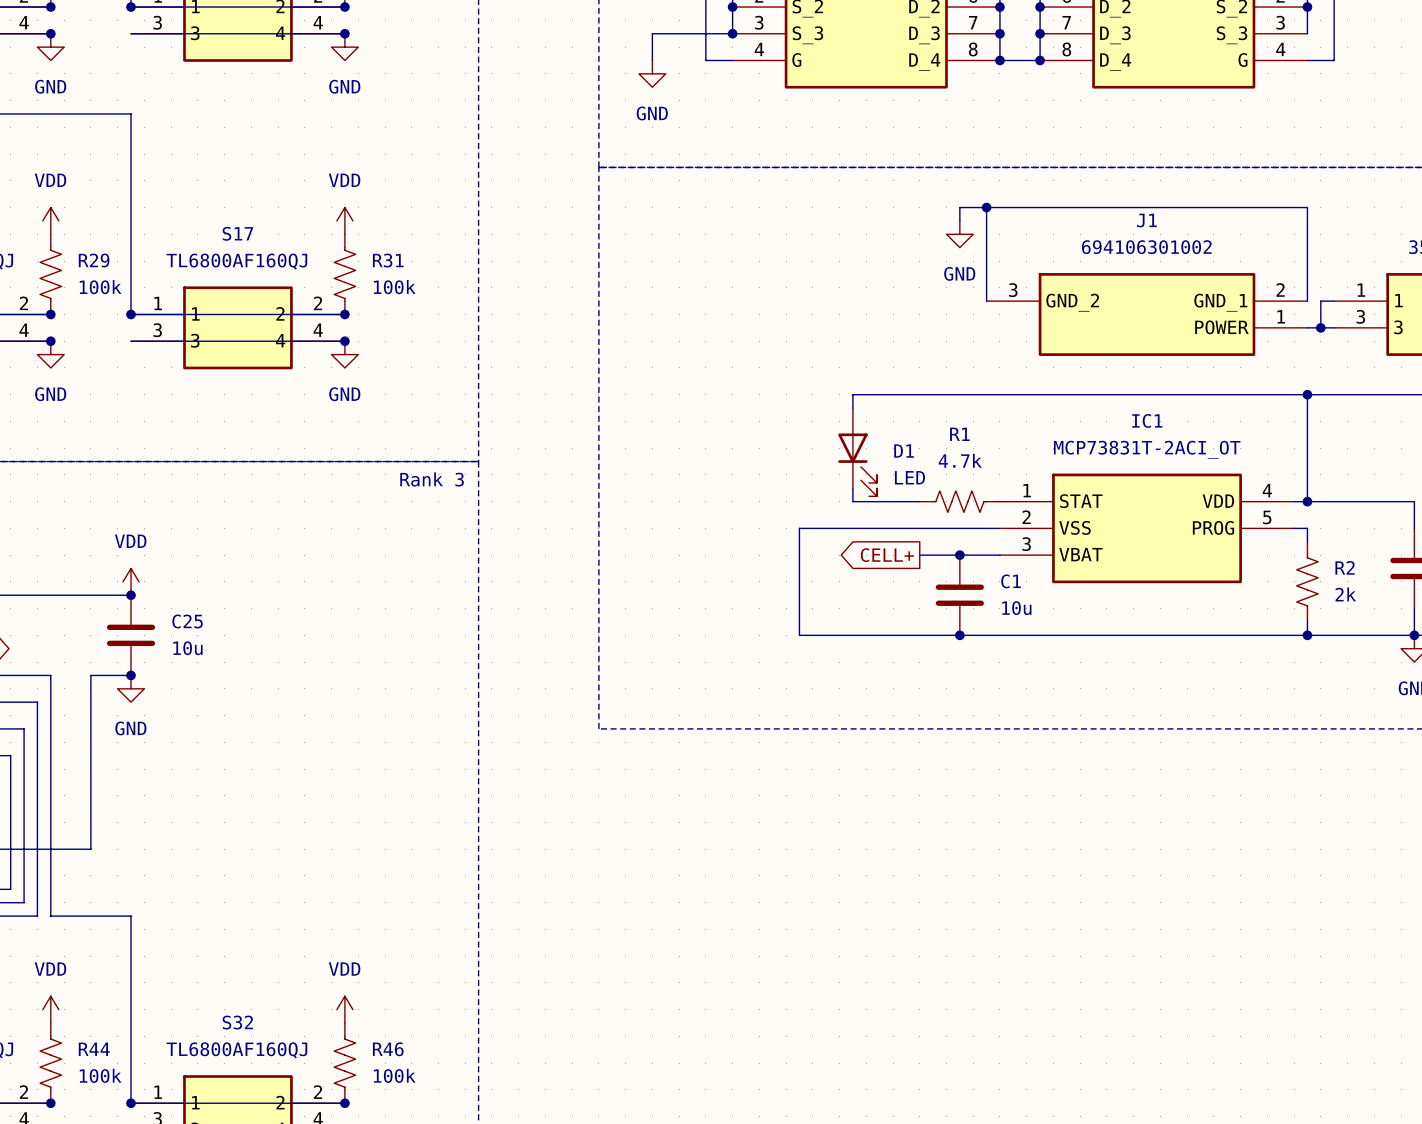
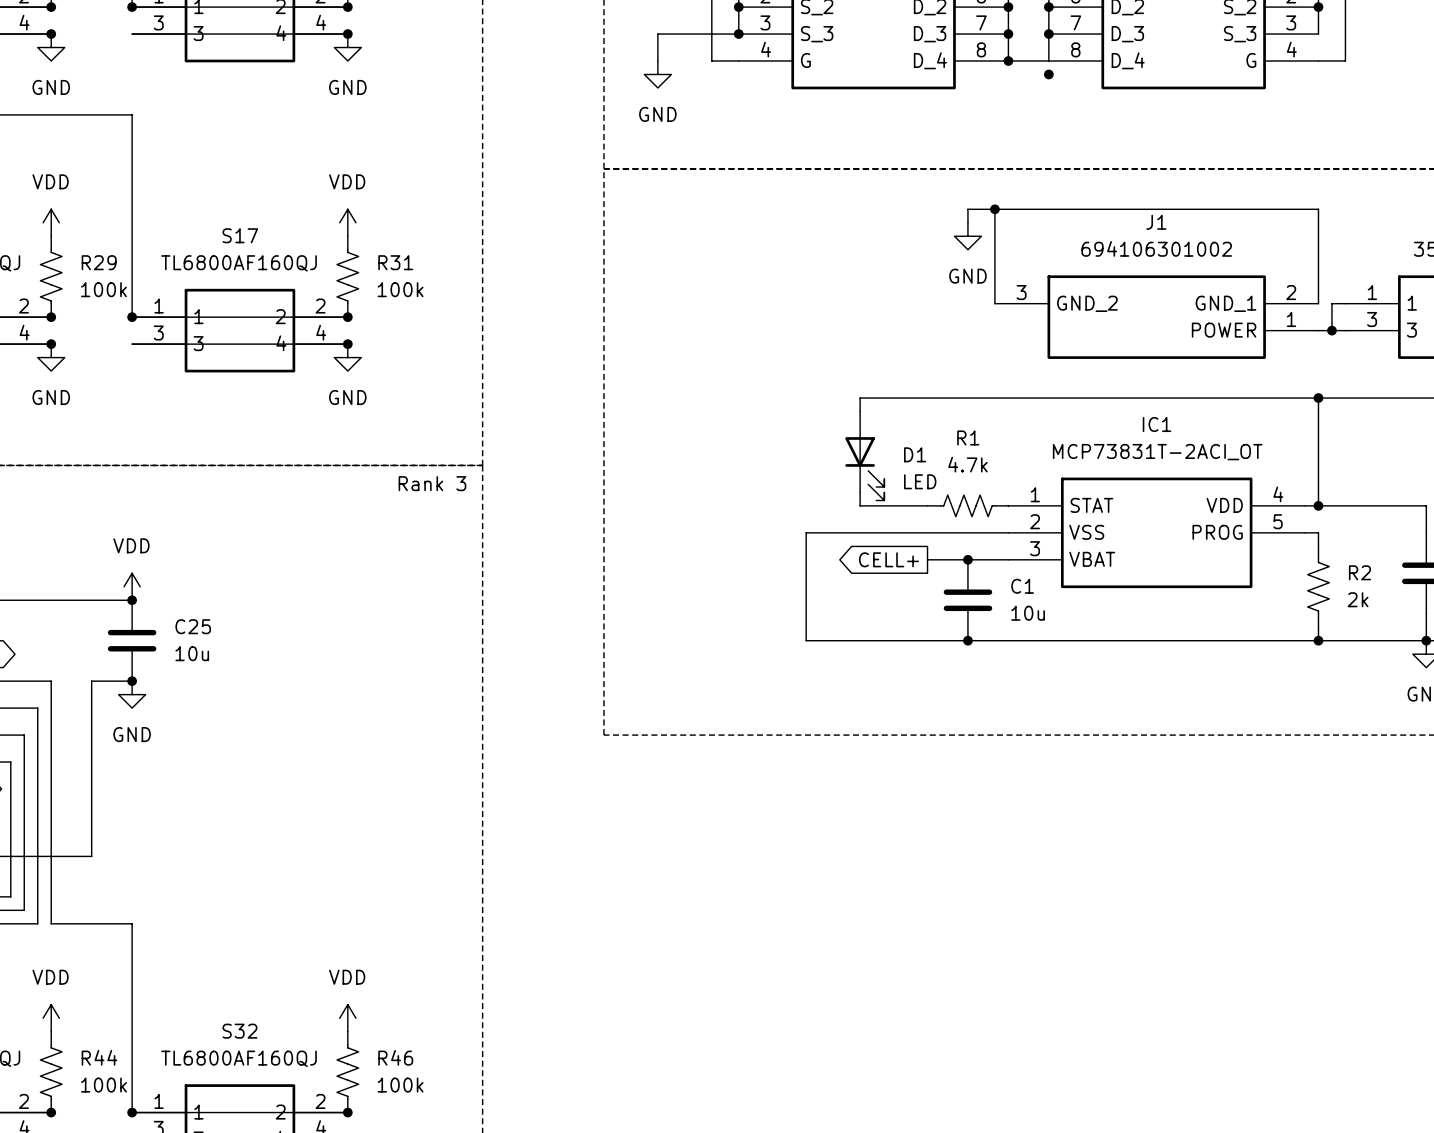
junction position: (1040, 60) -> (1048, 74)

